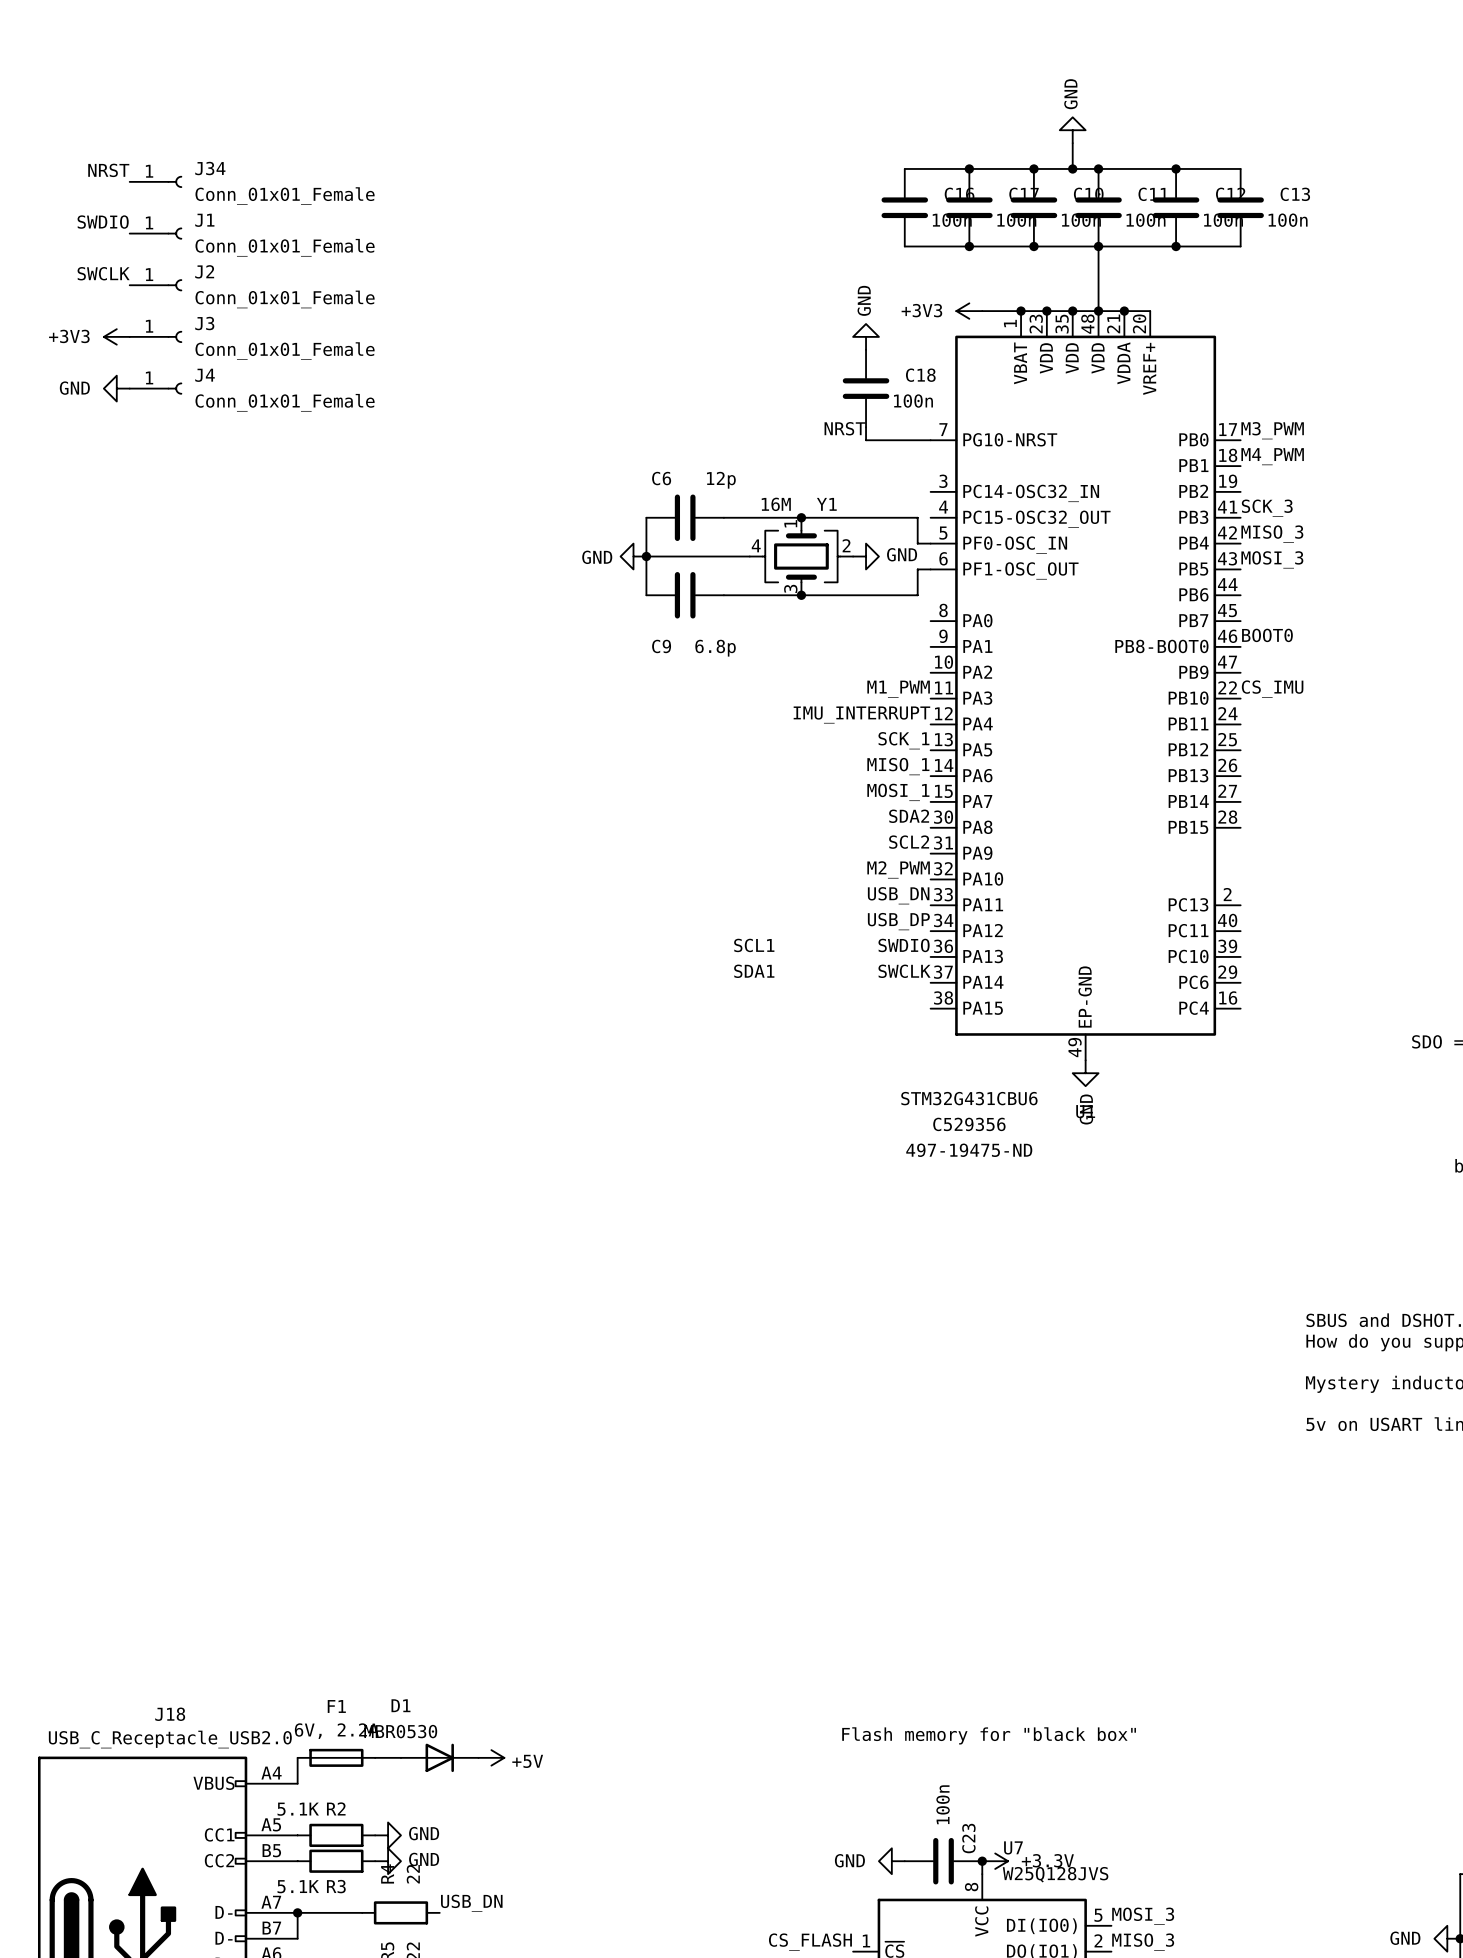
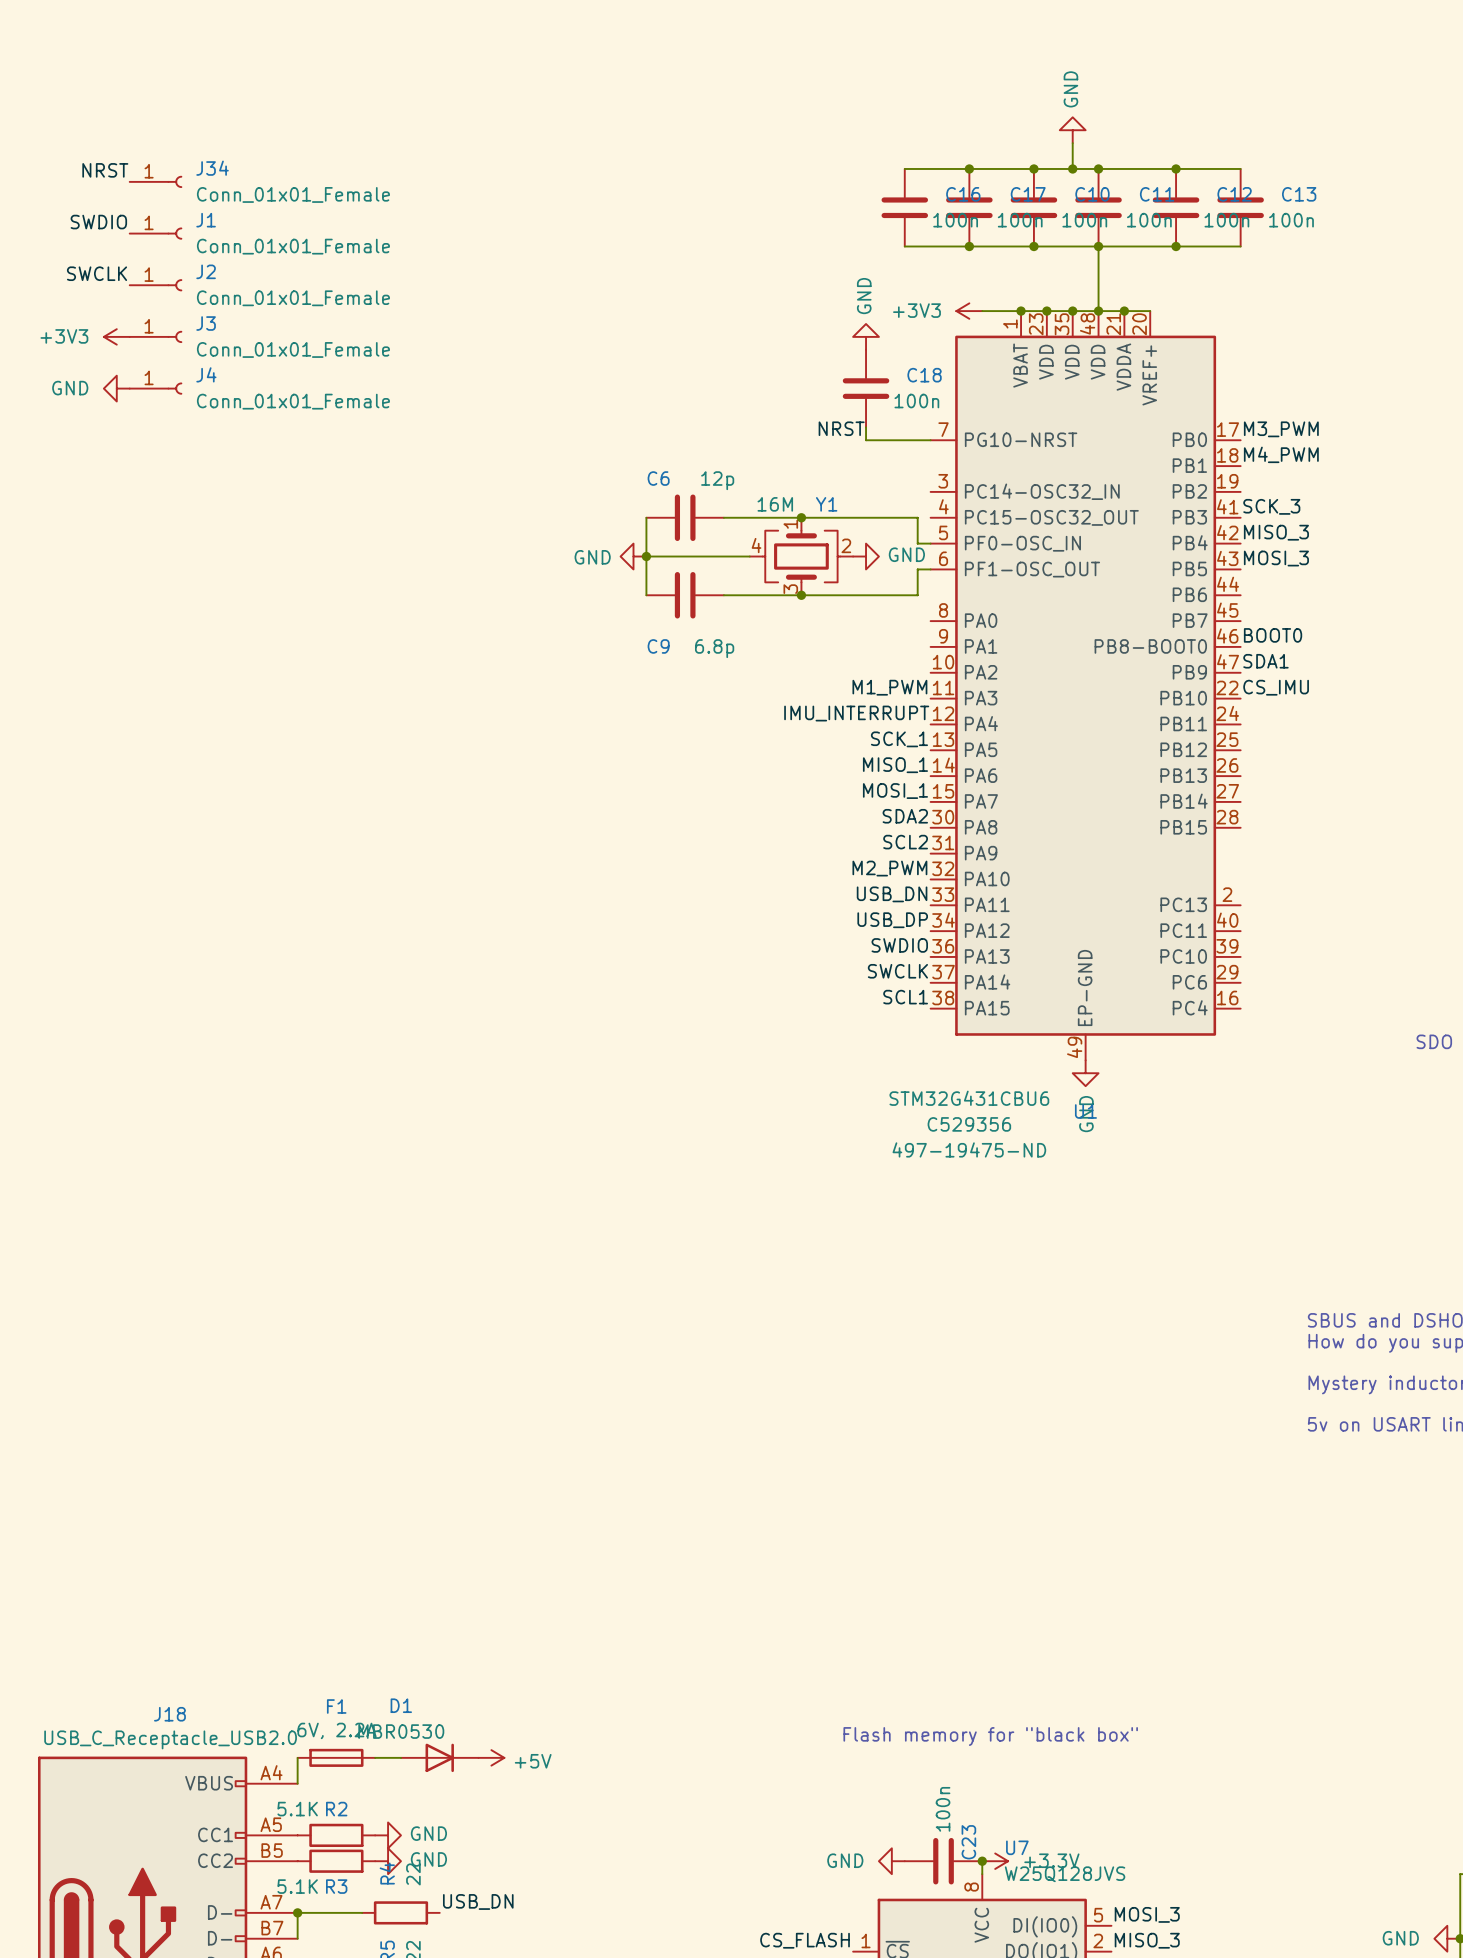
label: none -> SDA1 (1265, 661)
label position: SCL1 (754, 945) -> SCL1 (905, 997)
label: SDA1 (754, 971) -> none

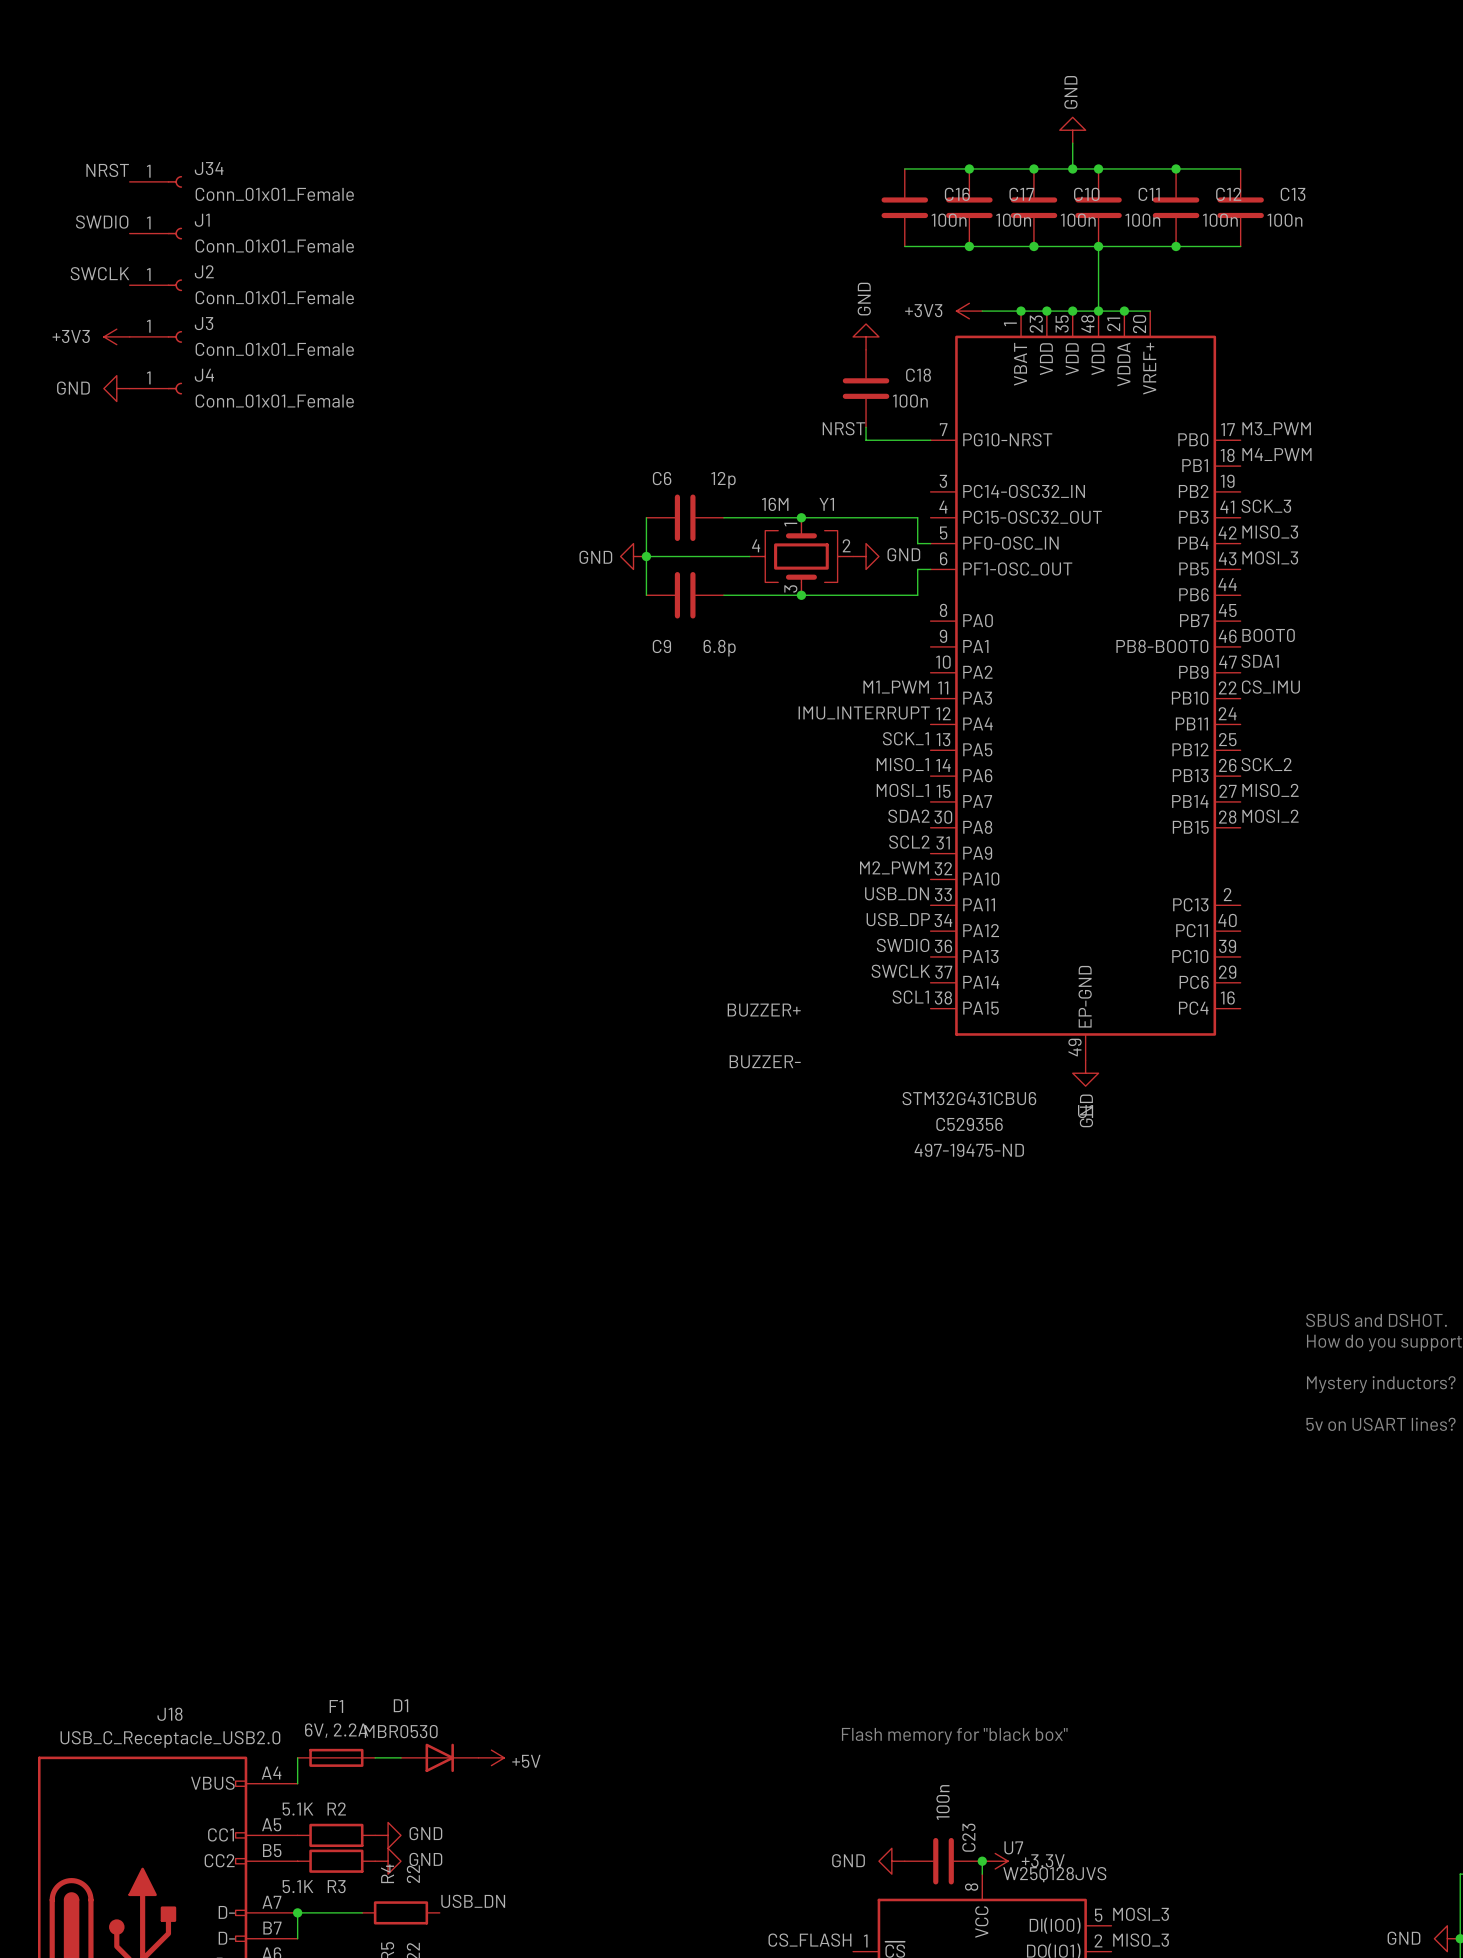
label: none -> SCK_2 (1266, 764)
label: none -> MISO_2 (1270, 790)
label: none -> MOSI_2 (1270, 816)
label: none -> BUZZER+ (764, 1010)
label: none -> BUZZER- (765, 1061)

